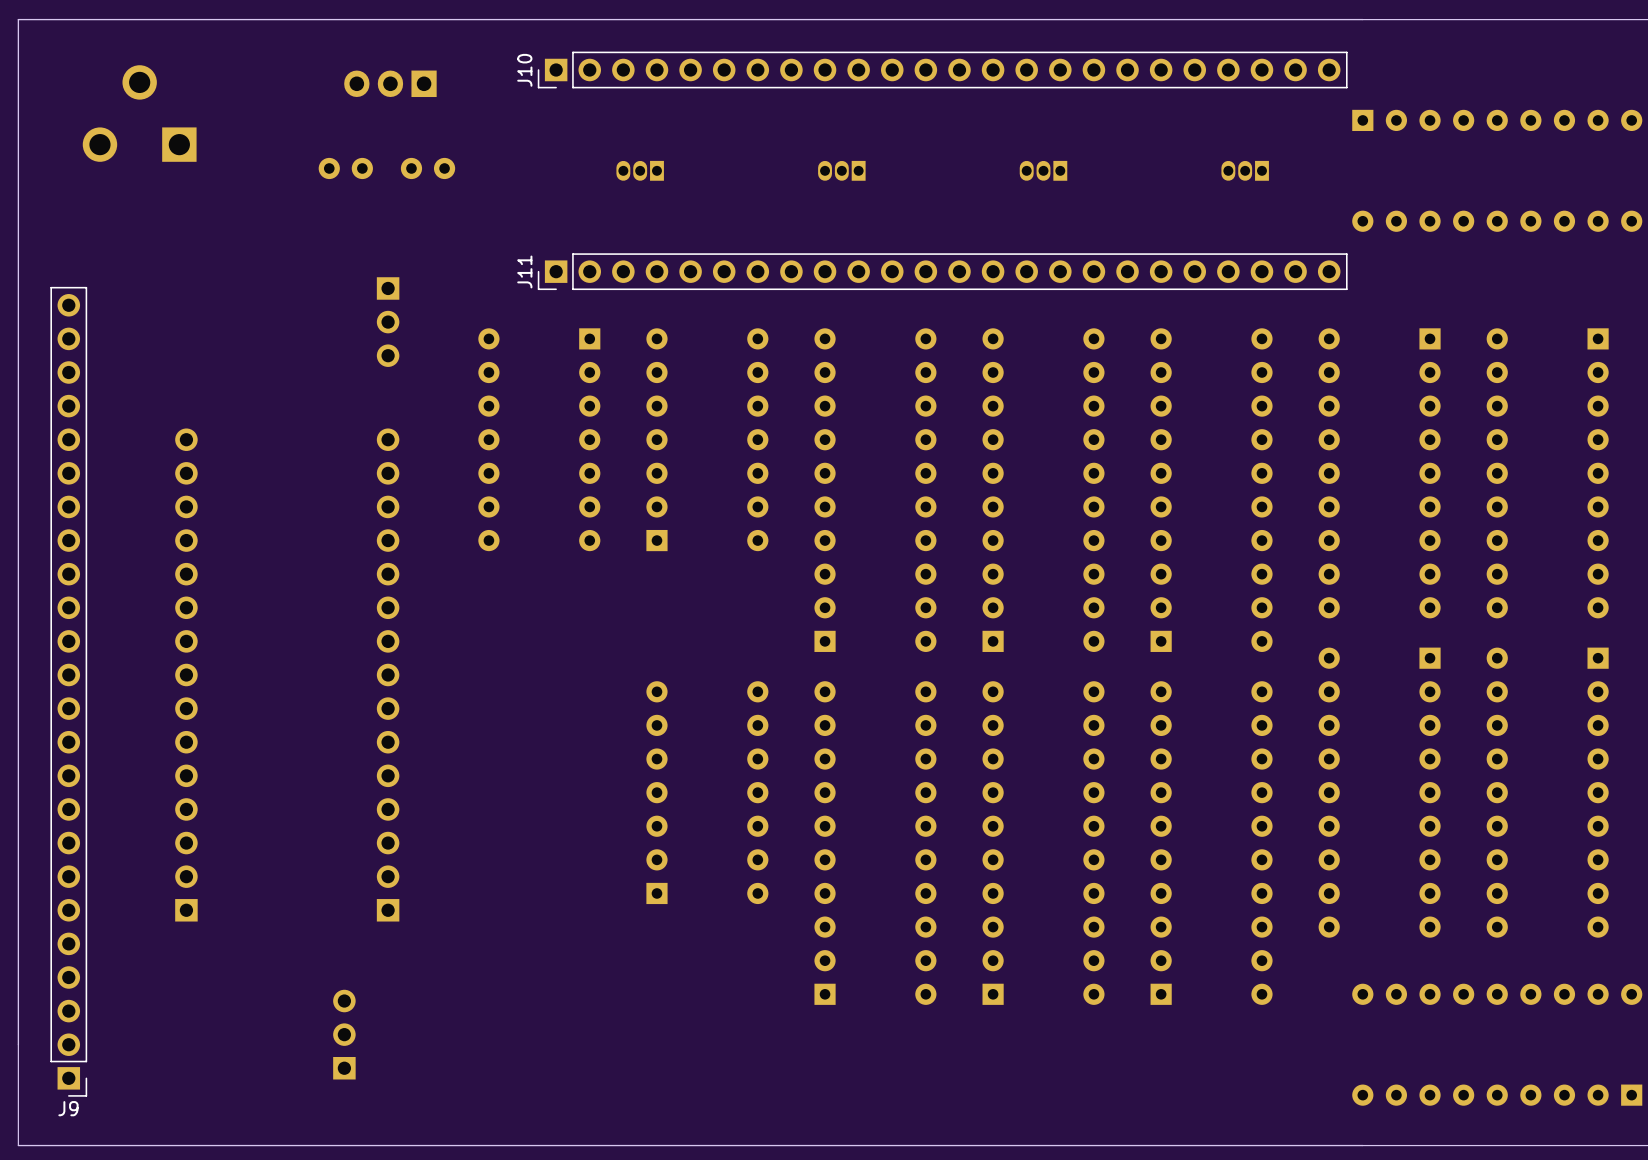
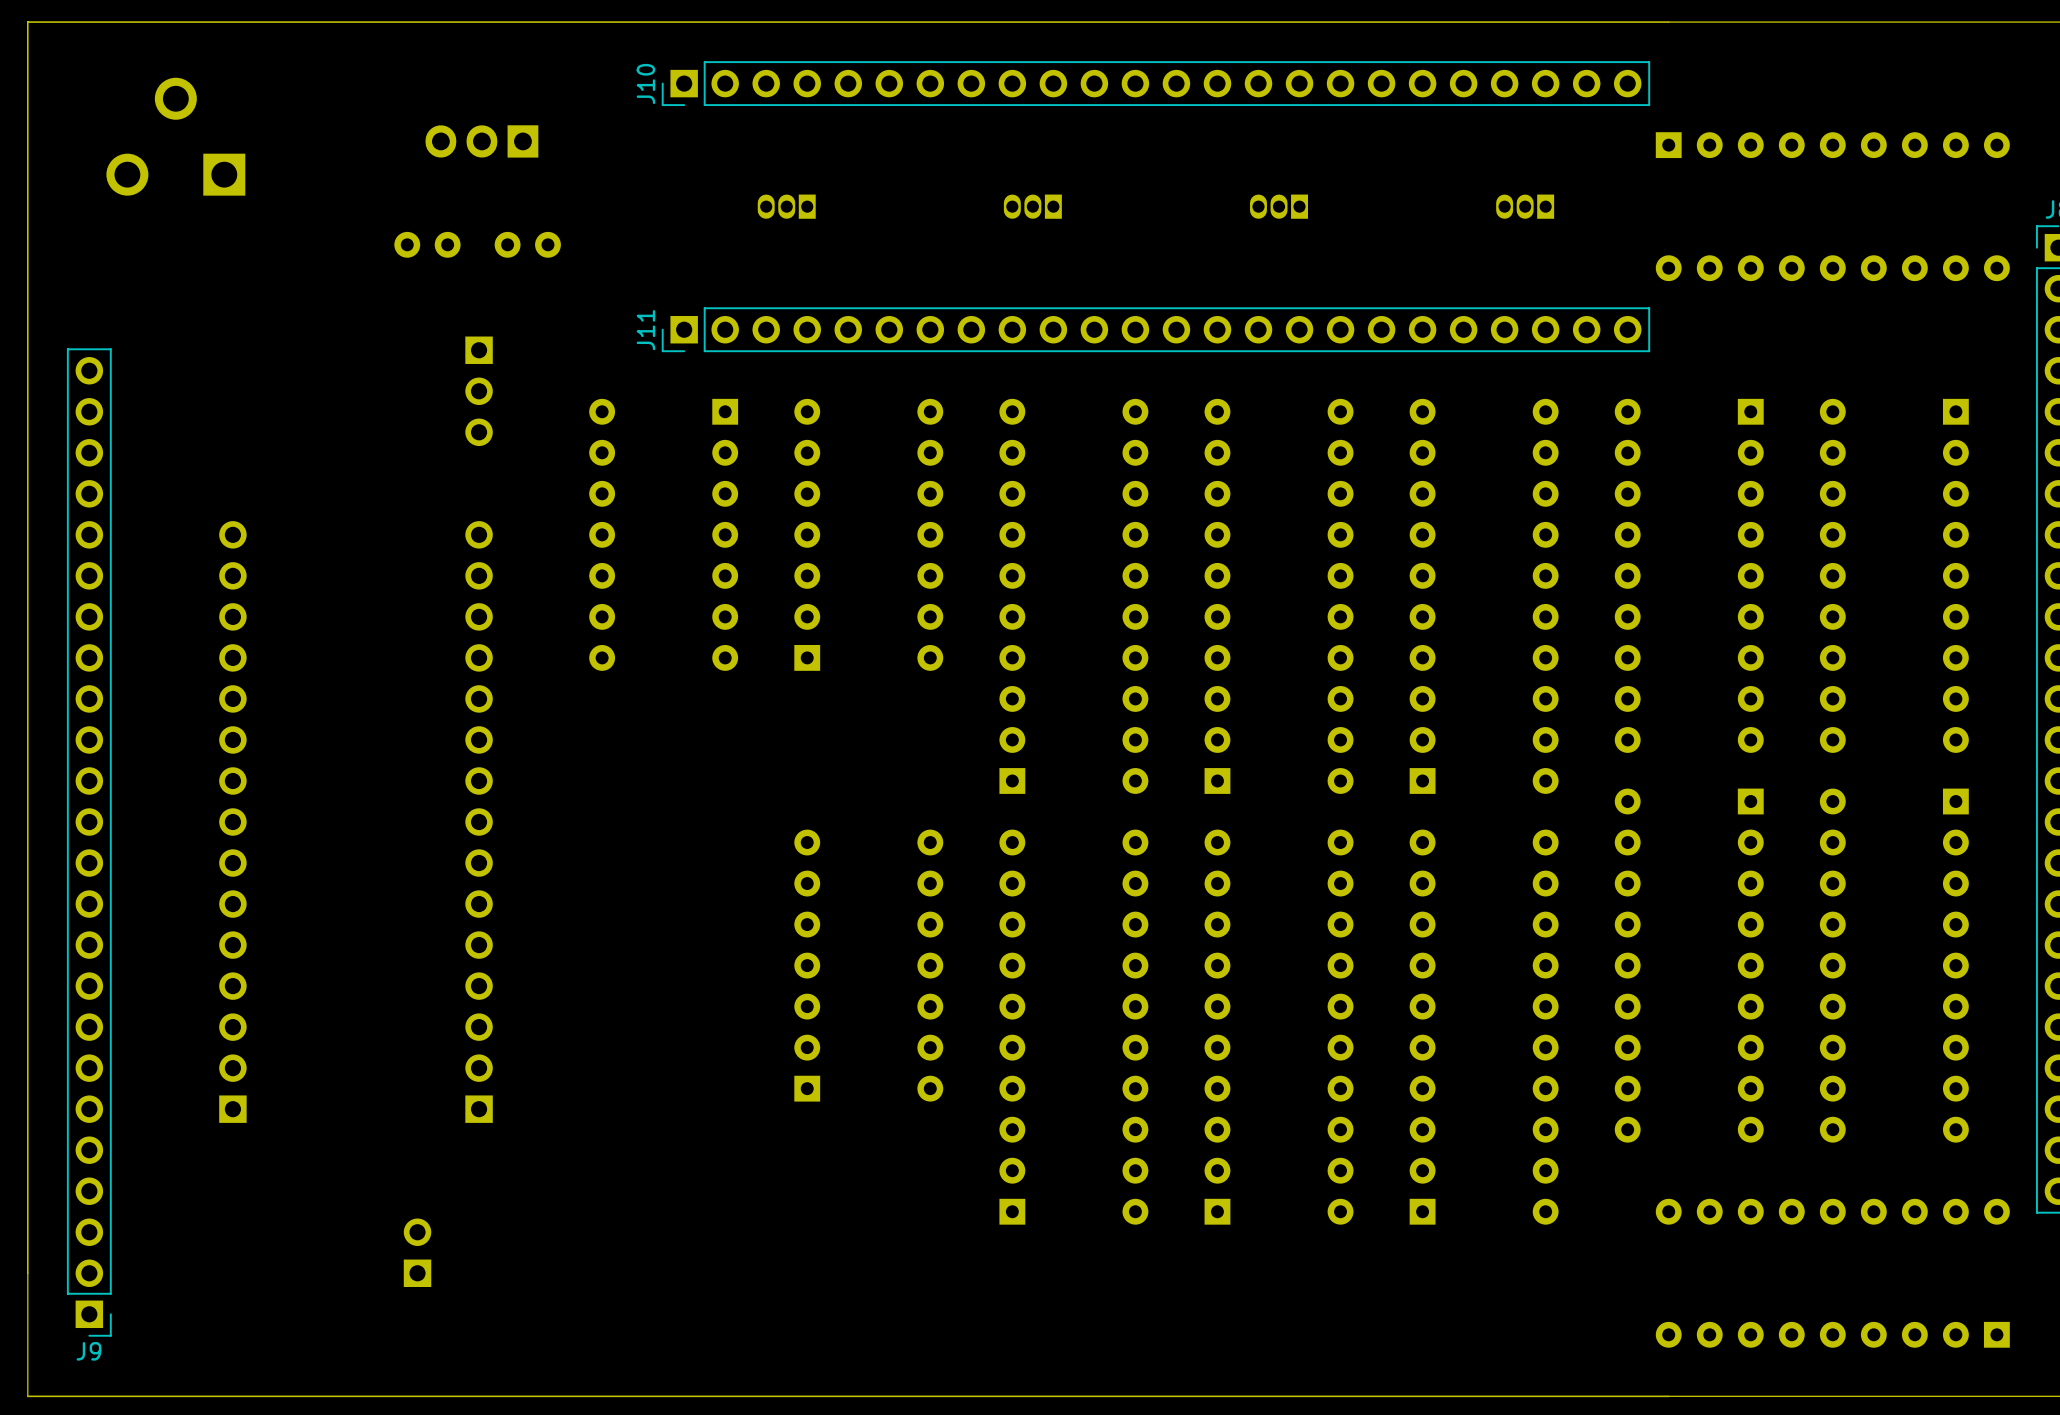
part position: (390, 83) -> (481, 141)
part position: (345, 168) -> (427, 244)
part position: (428, 168) -> (527, 244)
part footprint: [333, 989, 356, 1080] -> [403, 1218, 432, 1287]

